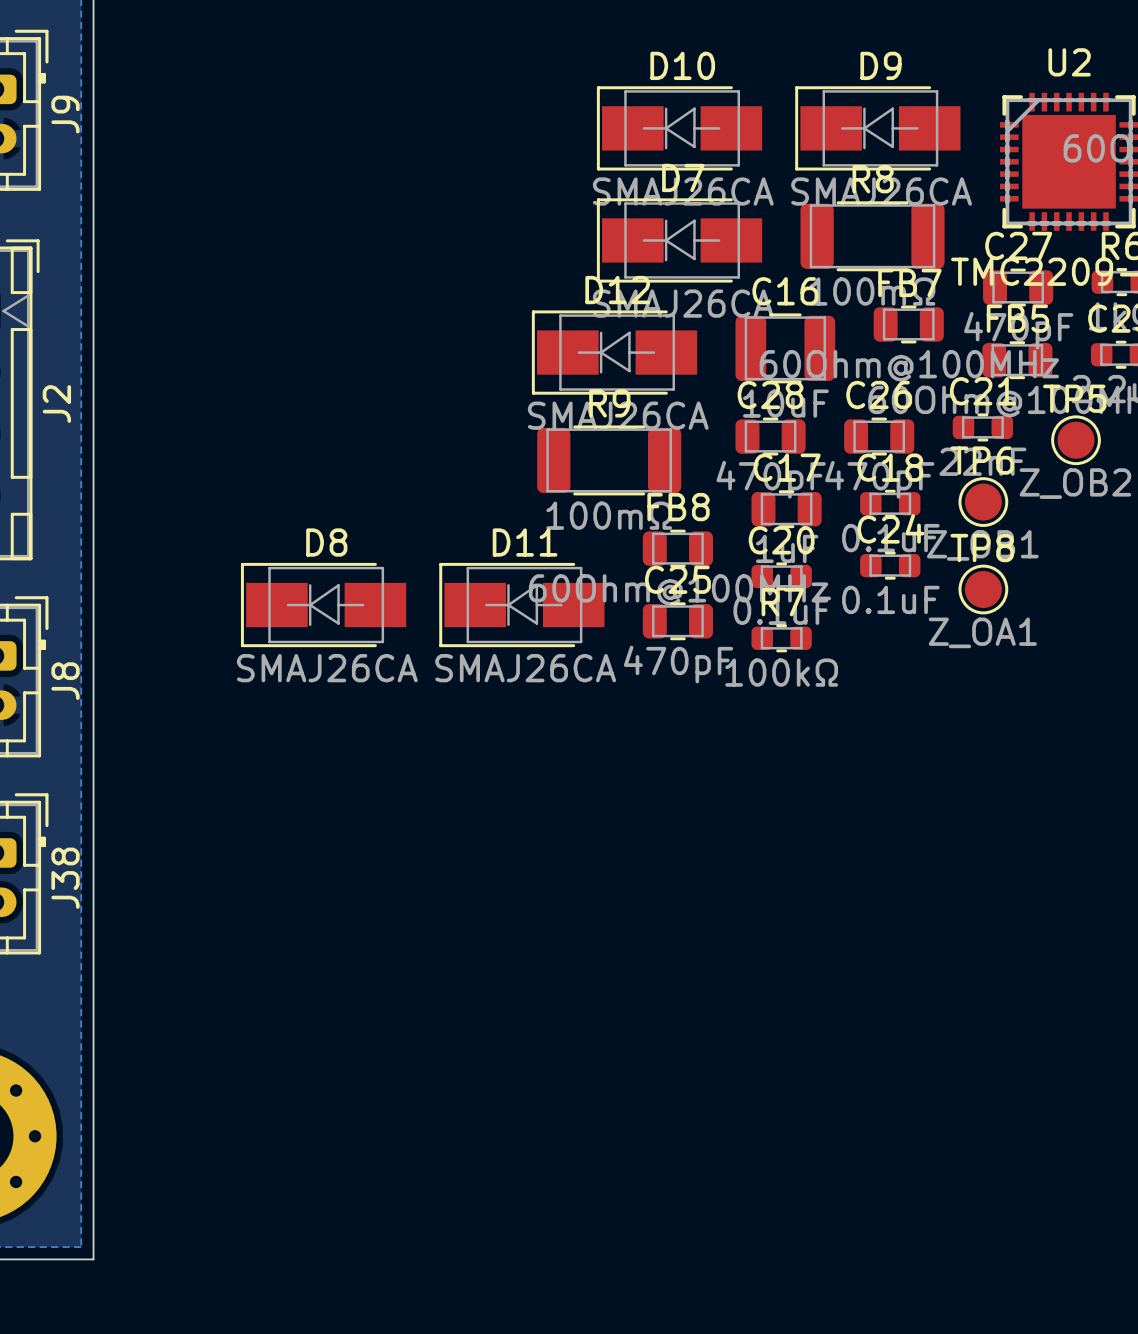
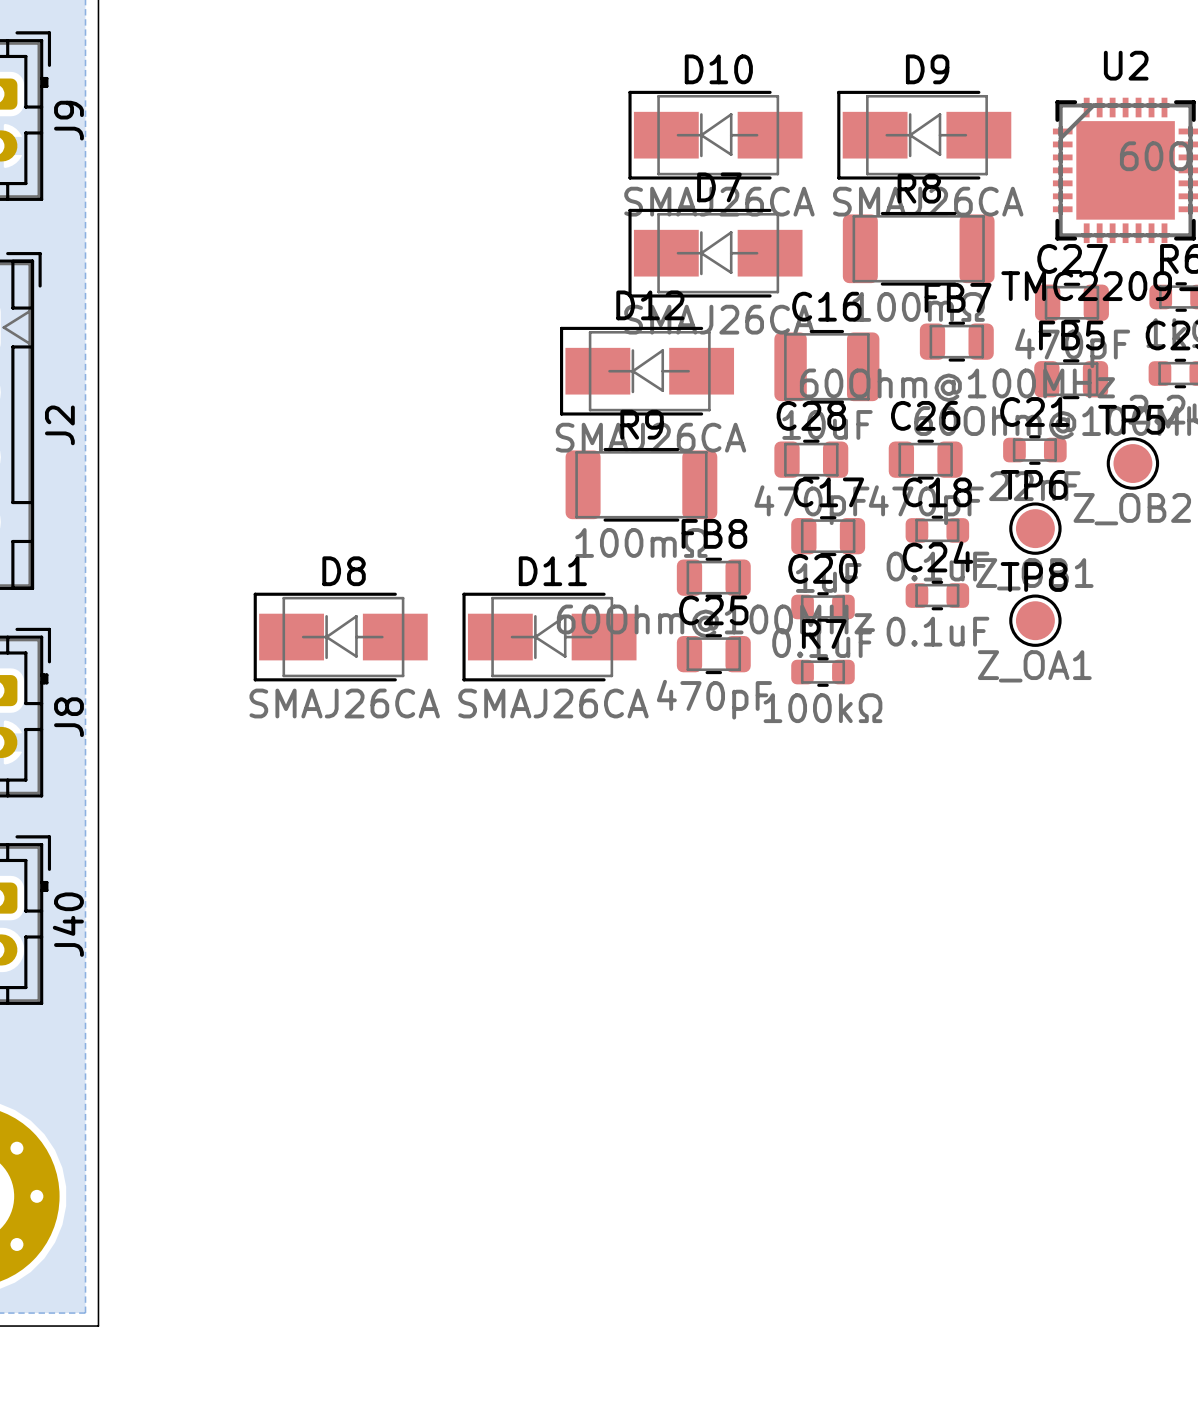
J38 name: J38 (65, 878) -> J40 (68, 924)

